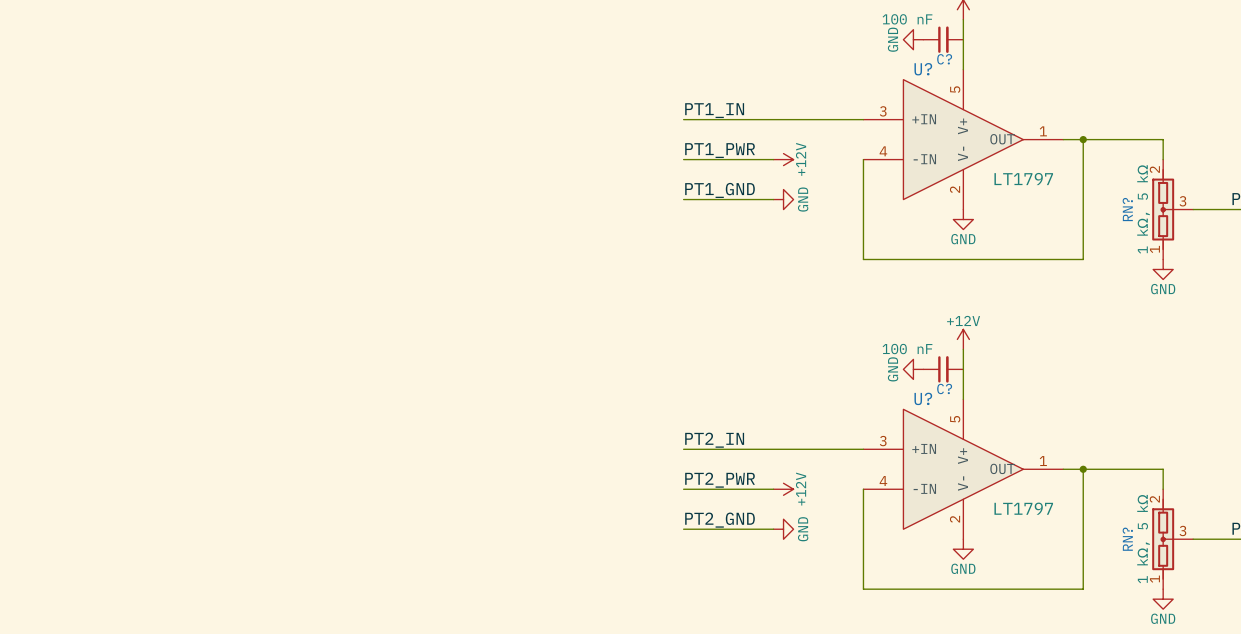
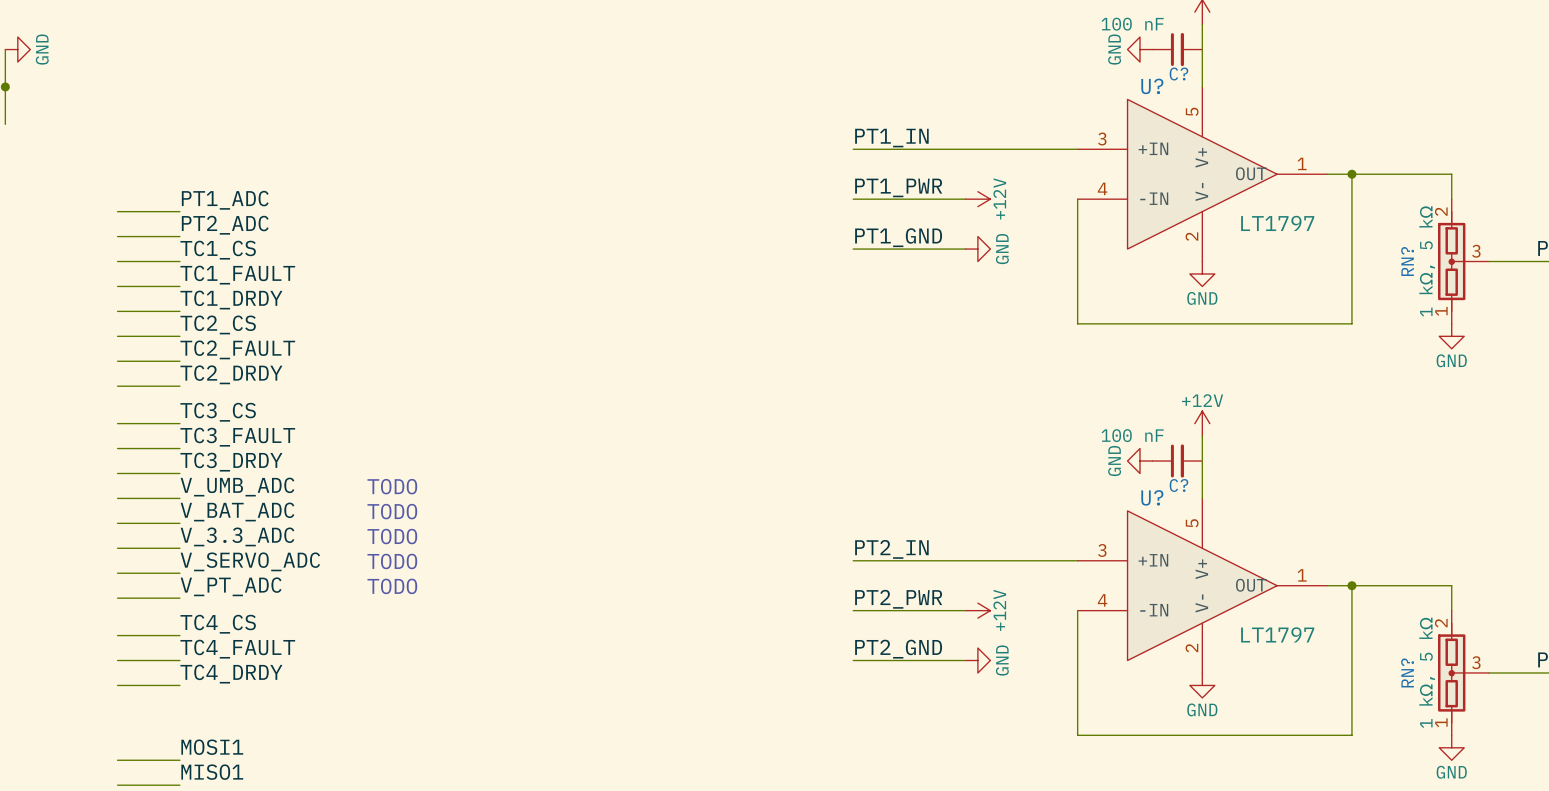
wire: none -> (5, 49) (5, 124)
power symbol: none -> GND (17, 49)
junction: none -> (5, 86)
label: none -> PT1_ADC (225, 200)
wire: none -> (117, 211) (179, 211)
label: none -> PT2_ADC (225, 225)
wire: none -> (117, 236) (179, 236)
label: none -> TC1_CS (218, 250)
wire: none -> (117, 261) (179, 261)
label: none -> TC1_FAULT (237, 275)
wire: none -> (117, 286) (179, 286)
label: none -> TC1_DRDY (231, 300)
wire: none -> (117, 311) (179, 311)
label: none -> TC2_CS (218, 324)
wire: none -> (117, 336) (179, 336)
label: none -> TC2_FAULT (237, 349)
wire: none -> (117, 361) (179, 361)
label: none -> TC2_DRDY (231, 374)
wire: none -> (117, 386) (179, 386)
label: none -> TC3_CS (218, 412)
wire: none -> (117, 423) (179, 423)
label: none -> TC3_FAULT (237, 437)
wire: none -> (117, 448) (179, 448)
label: none -> TC3_DRDY (231, 462)
wire: none -> (117, 473) (179, 473)
text: none -> TODO (392, 486)
label: none -> V_UMB_ADC (237, 487)
wire: none -> (117, 498) (179, 498)
text: none -> TODO (392, 511)
label: none -> V_BAT_ADC (237, 511)
wire: none -> (117, 523) (179, 523)
text: none -> TODO (392, 536)
label: none -> V_3.3_ADC (237, 536)
wire: none -> (117, 548) (179, 548)
text: none -> TODO (392, 561)
label: none -> V_SERVO_ADC (250, 561)
wire: none -> (117, 573) (179, 573)
text: none -> TODO (392, 586)
label: none -> V_PT_ADC (231, 586)
wire: none -> (117, 598) (179, 598)
label: none -> TC4_CS (218, 624)
wire: none -> (117, 635) (179, 635)
label: none -> TC4_FAULT (237, 649)
wire: none -> (117, 660) (179, 660)
label: none -> TC4_DRDY (231, 674)
wire: none -> (117, 685) (179, 685)
label: none -> MOSI1 (212, 747)
wire: none -> (117, 760) (179, 760)
label: none -> MISO1 (212, 772)
wire: none -> (117, 785) (179, 785)

